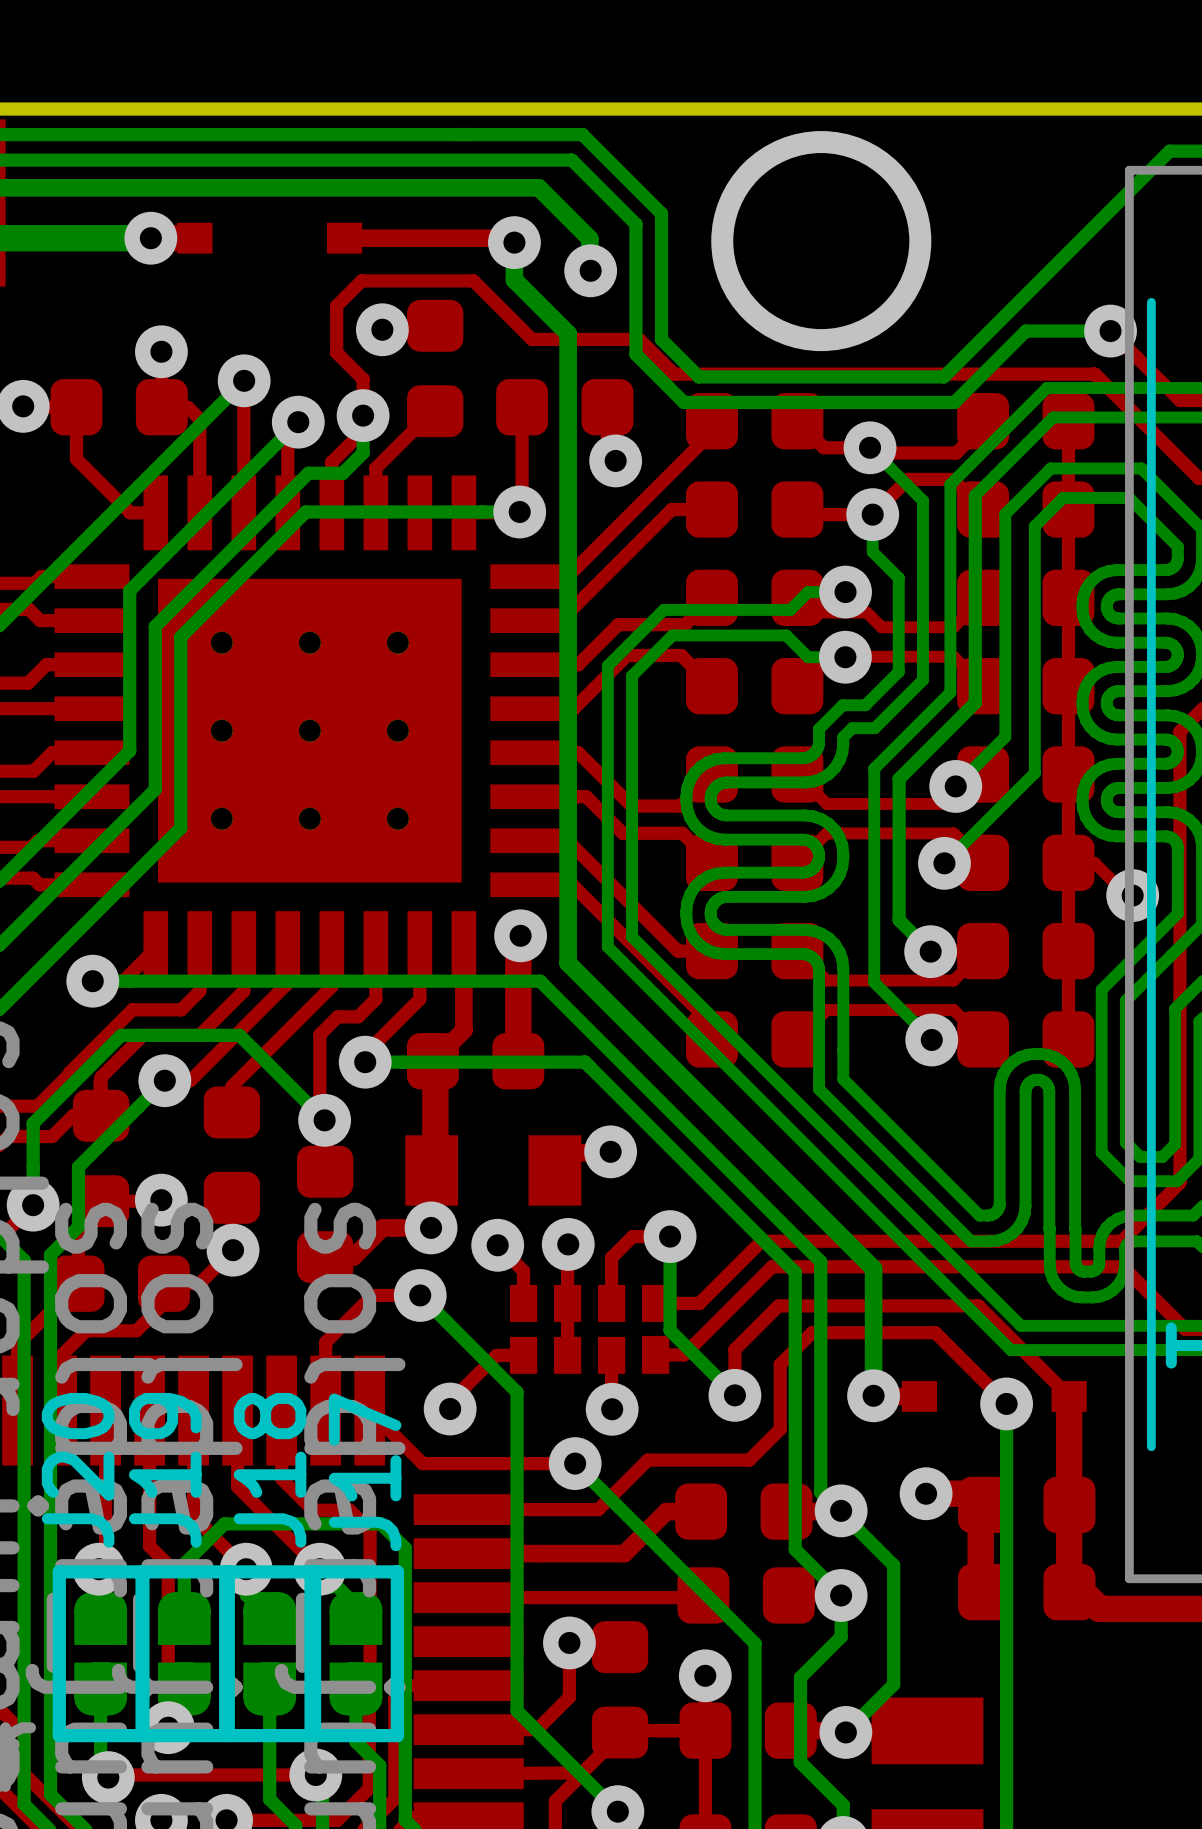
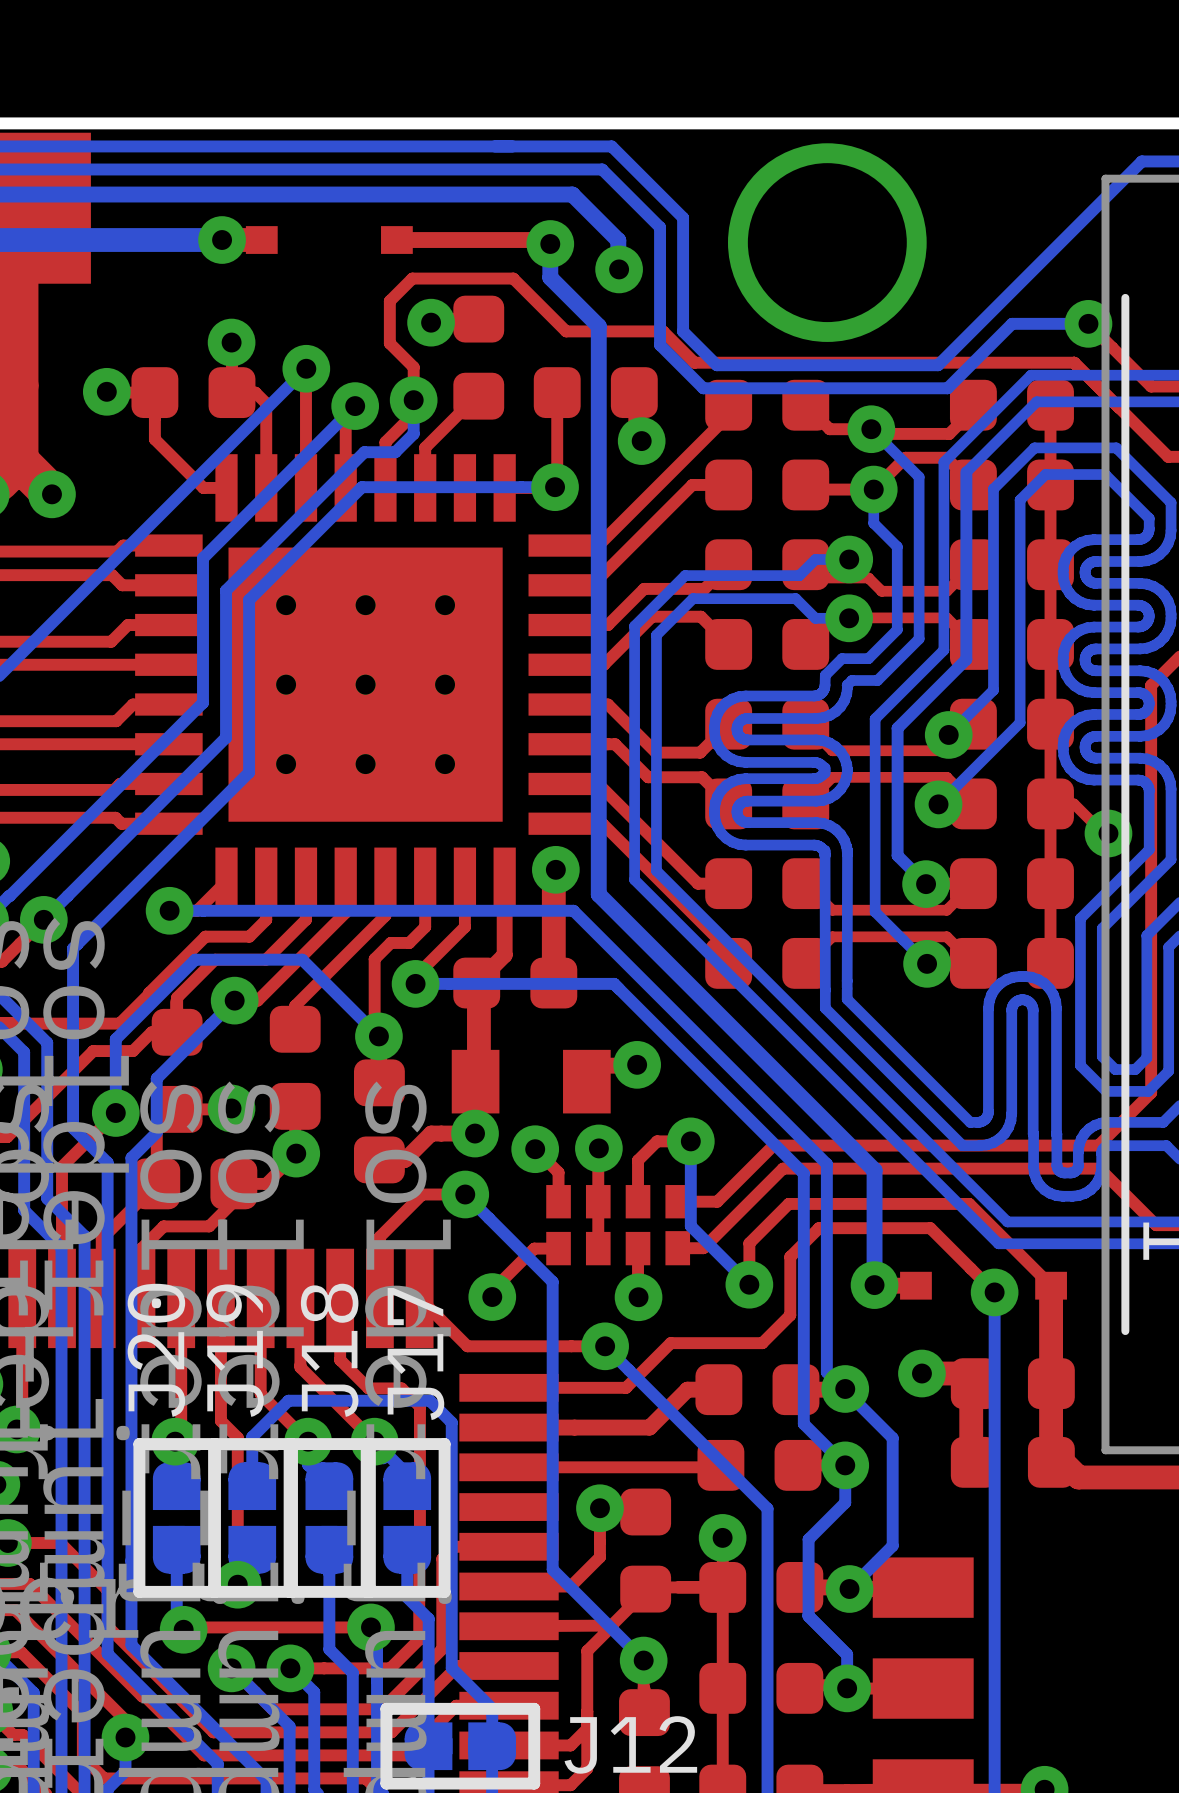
bottom track: (898, 670) (865, 705) (842, 705) (819, 728) (818, 745) (815, 752) (809, 756) (716, 759) (700, 766) (694, 772) (687, 788) (686, 801) (690, 817) (700, 831) (708, 835) (724, 839) (806, 840) (812, 843) (817, 848) (819, 856) (817, 863) (812, 869) (806, 872) (724, 872) (708, 876) (694, 887) (690, 894) (686, 915) (687, 924) (694, 939) (700, 945) (716, 953) (802, 954) (809, 955) (815, 960) (819, 970) (819, 1068) -> (897, 629) (868, 658) (842, 658) (825, 675) (824, 687) (818, 694) (738, 696) (726, 702) (721, 707) (715, 720) (714, 731) (717, 744) (721, 750) (732, 759) (745, 762) (816, 762) (822, 766) (823, 768) (824, 770) (825, 773) (825, 767) (824, 770) (823, 772) (822, 774) (816, 778) (745, 778) (732, 781) (726, 785) (717, 796) (714, 813) (715, 820) (721, 833) (726, 838) (738, 844) (816, 845) (822, 849) (825, 855) (825, 850) (825, 989)
bottom track: (876, 726) (874, 728) (852, 728) (843, 737) (842, 752) (839, 760) (828, 774) (821, 778) (804, 782) (723, 782) (714, 788) (710, 798) (714, 809) (723, 815) (813, 816) (828, 823) (839, 837) (843, 853) (842, 867) (834, 882) (821, 893) (804, 896) (723, 897) (714, 903) (710, 913) (714, 923) (723, 929) (813, 930) (828, 938) (834, 944) (842, 959) (843, 968) (843, 1058) -> (847, 769) (844, 783) (840, 789) (829, 798) (816, 801) (745, 801) (739, 805) (736, 811) (739, 818) (745, 822) (823, 823) (835, 829) (840, 834) (846, 846) (847, 853) (847, 850) (847, 980)
bottom track: none -> (877, 680) (851, 680) (847, 685) (846, 694) (840, 706) (835, 711) (823, 717) (747, 718) (740, 720) (737, 726) (739, 735) (745, 739) (816, 739) (829, 743) (840, 751) (844, 757) (847, 771)

